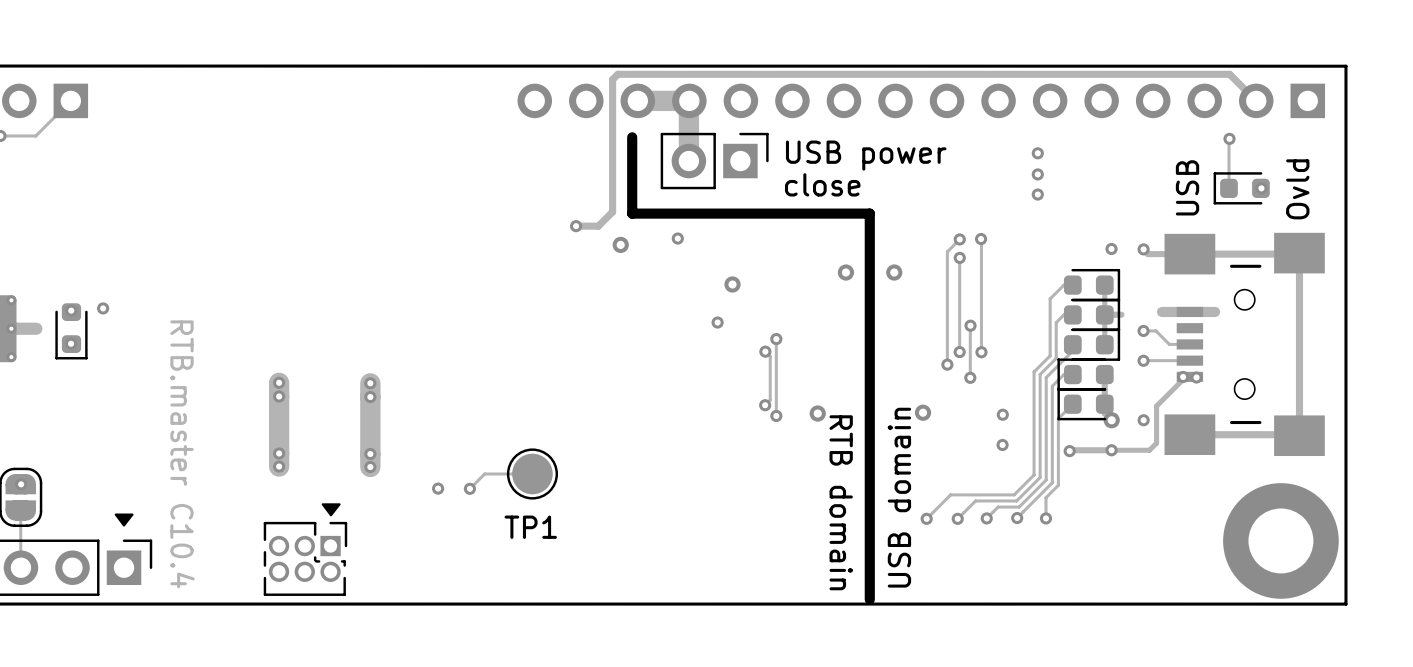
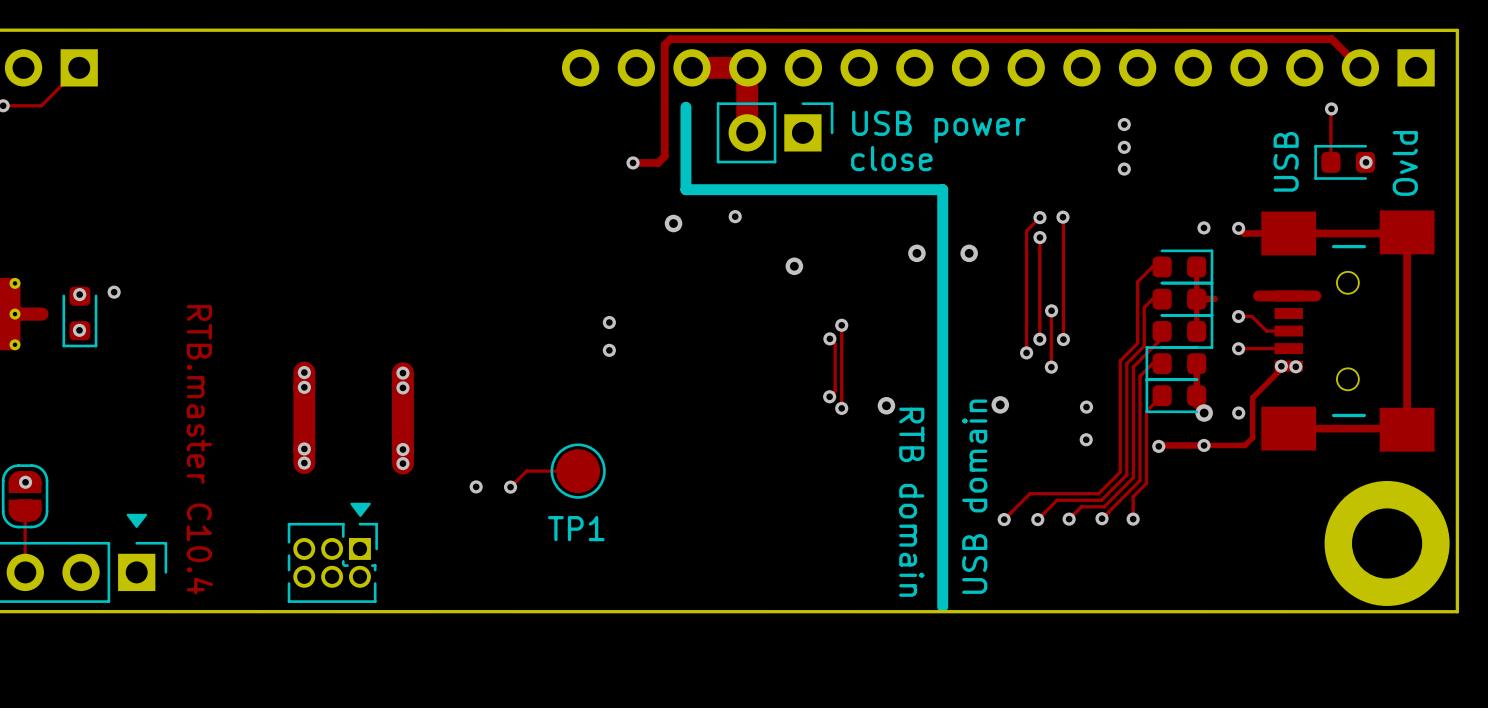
track: (612, 182) (612, 211) (598, 226) (576, 226) -> (664, 156) (658, 162) (633, 162)
via position: (576, 226) -> (633, 162)
via: (717, 322) -> none
via: none -> (609, 322)
via: none -> (609, 350)

